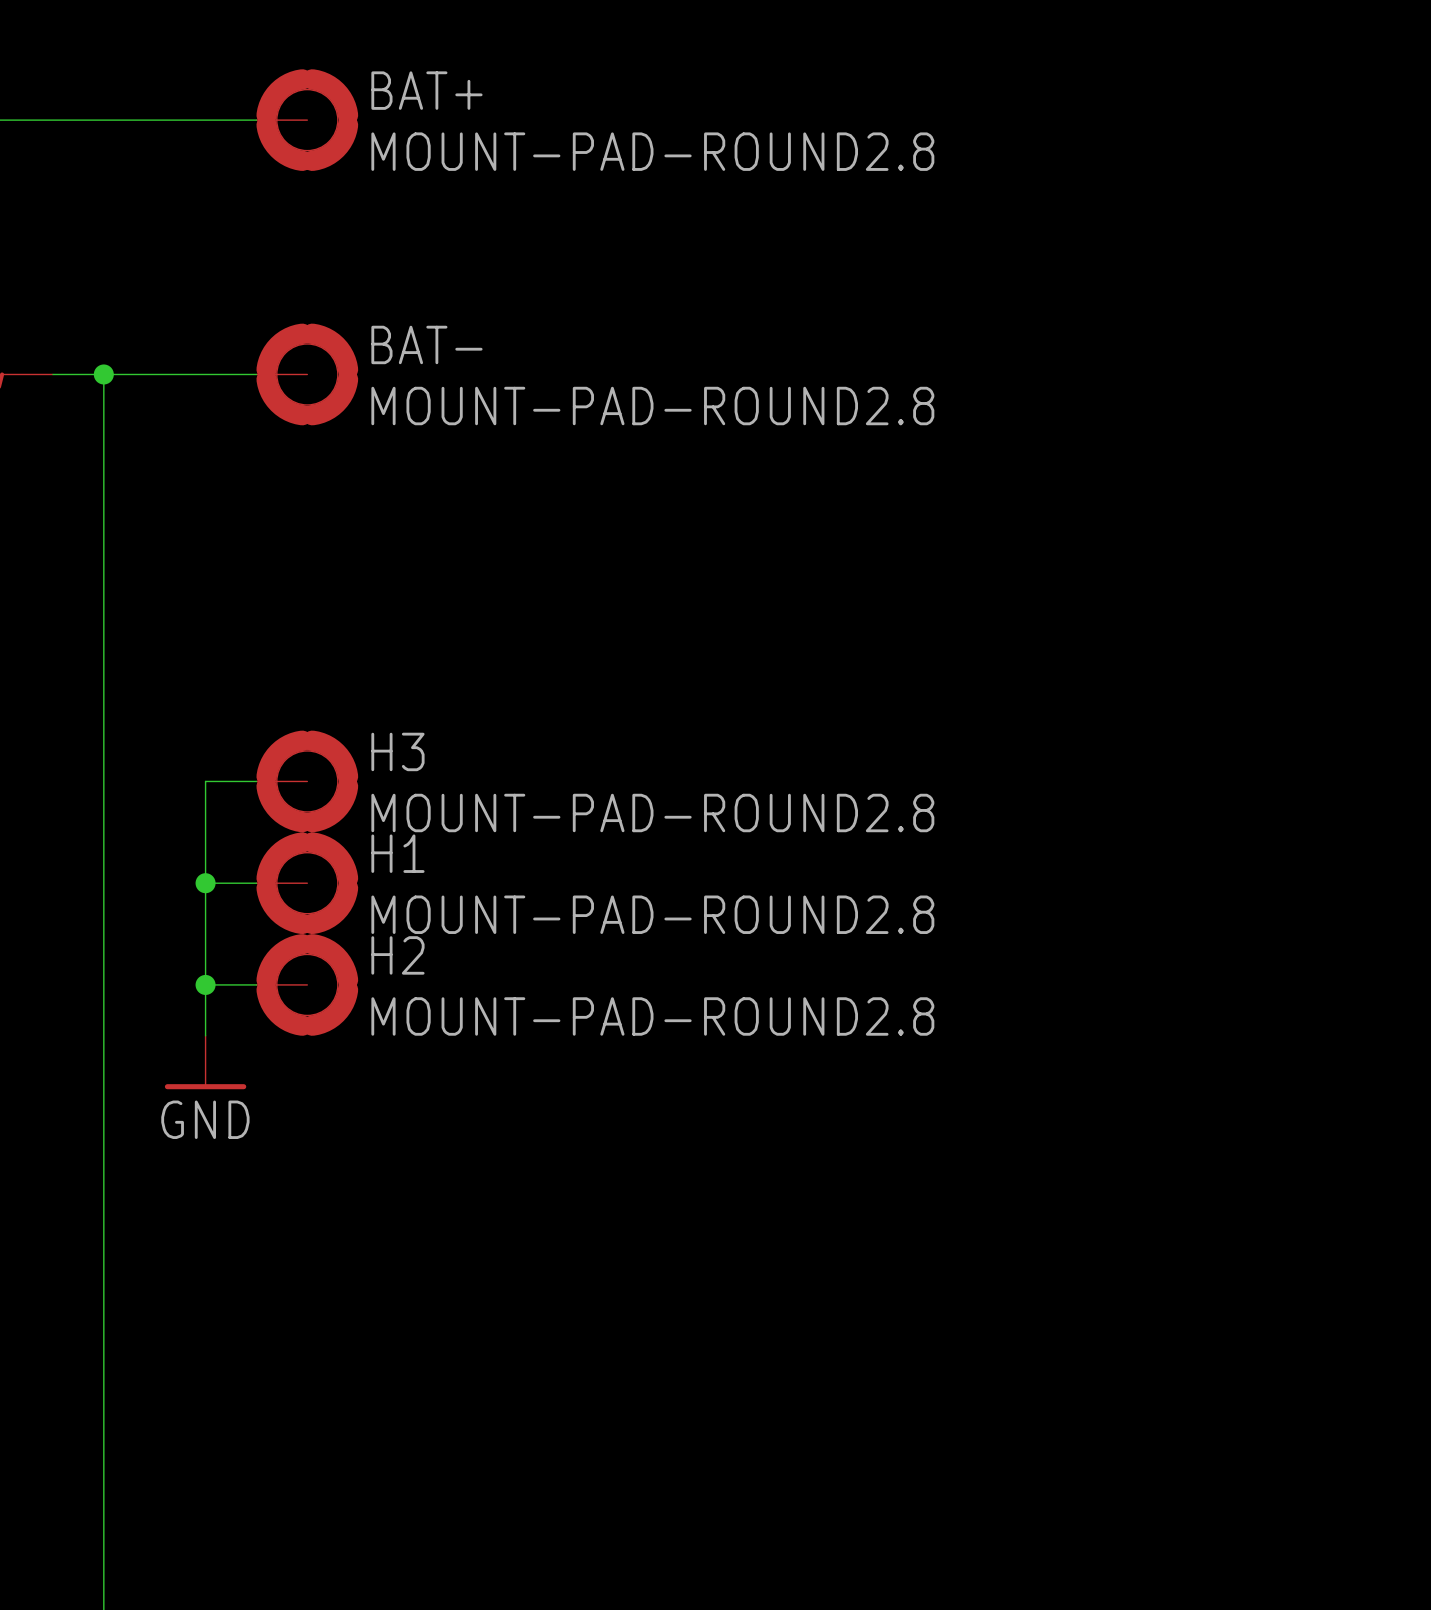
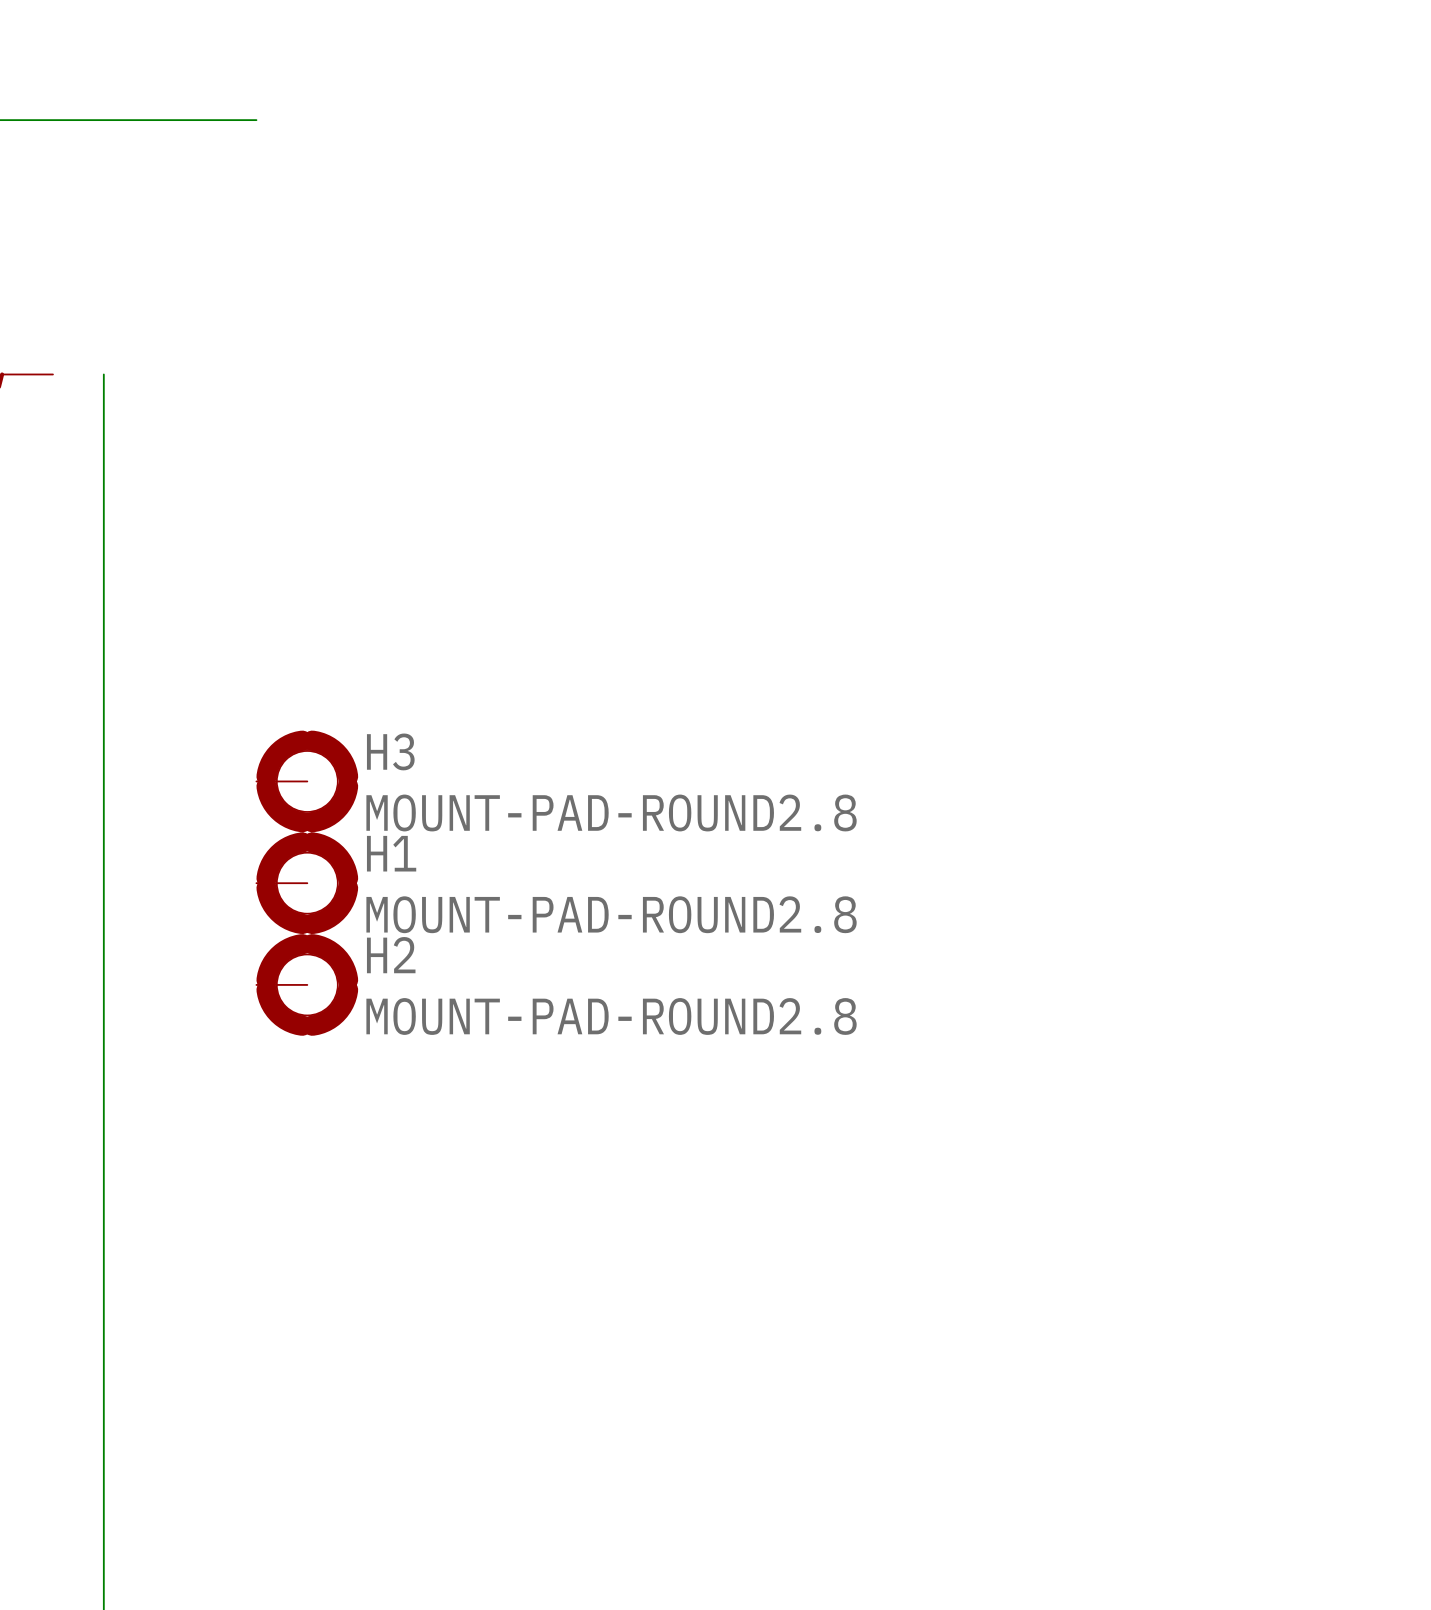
BAT+: MOUNT-PAD-ROUND2.8 (307, 120) -> none
wire: (52, 374) (256, 374) -> none
junction: (103, 374) -> none
BAT-: MOUNT-PAD-ROUND2.8 (307, 374) -> none
wire: (256, 781) (205, 781) (205, 1035) -> none
wire: (205, 883) (256, 883) -> none
junction: (205, 883) -> none
wire: (205, 984) (256, 984) -> none
junction: (205, 984) -> none
power symbol: GND (205, 1062) -> none

